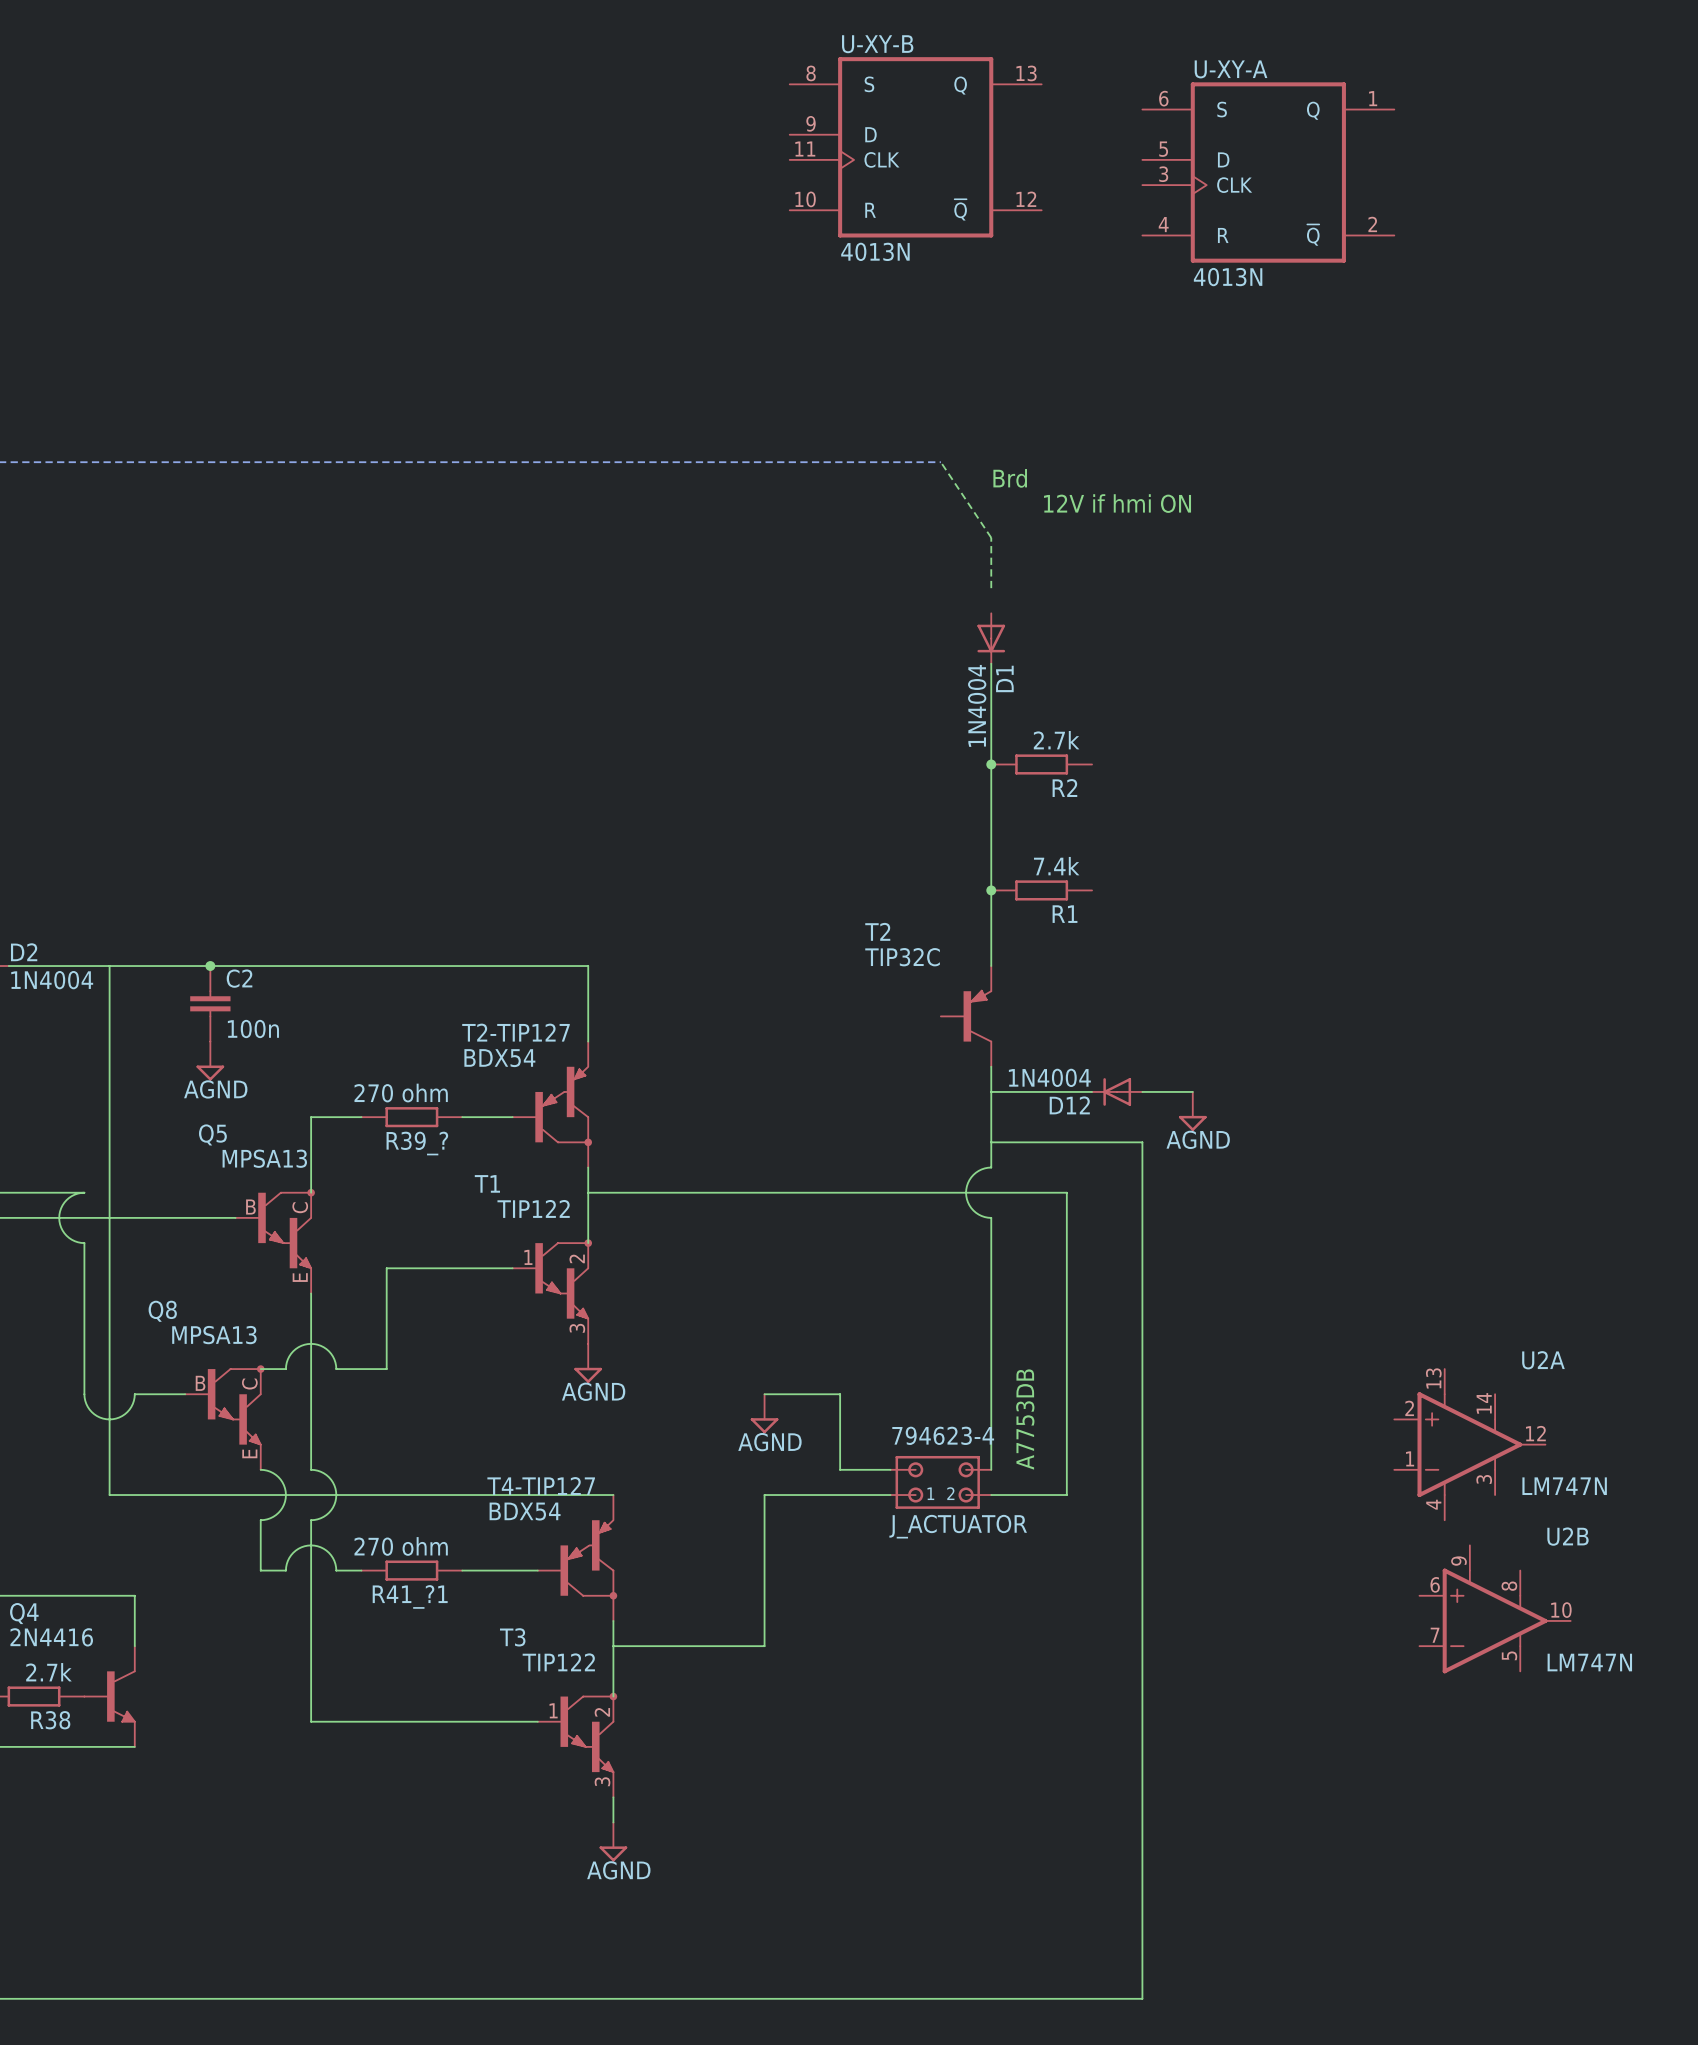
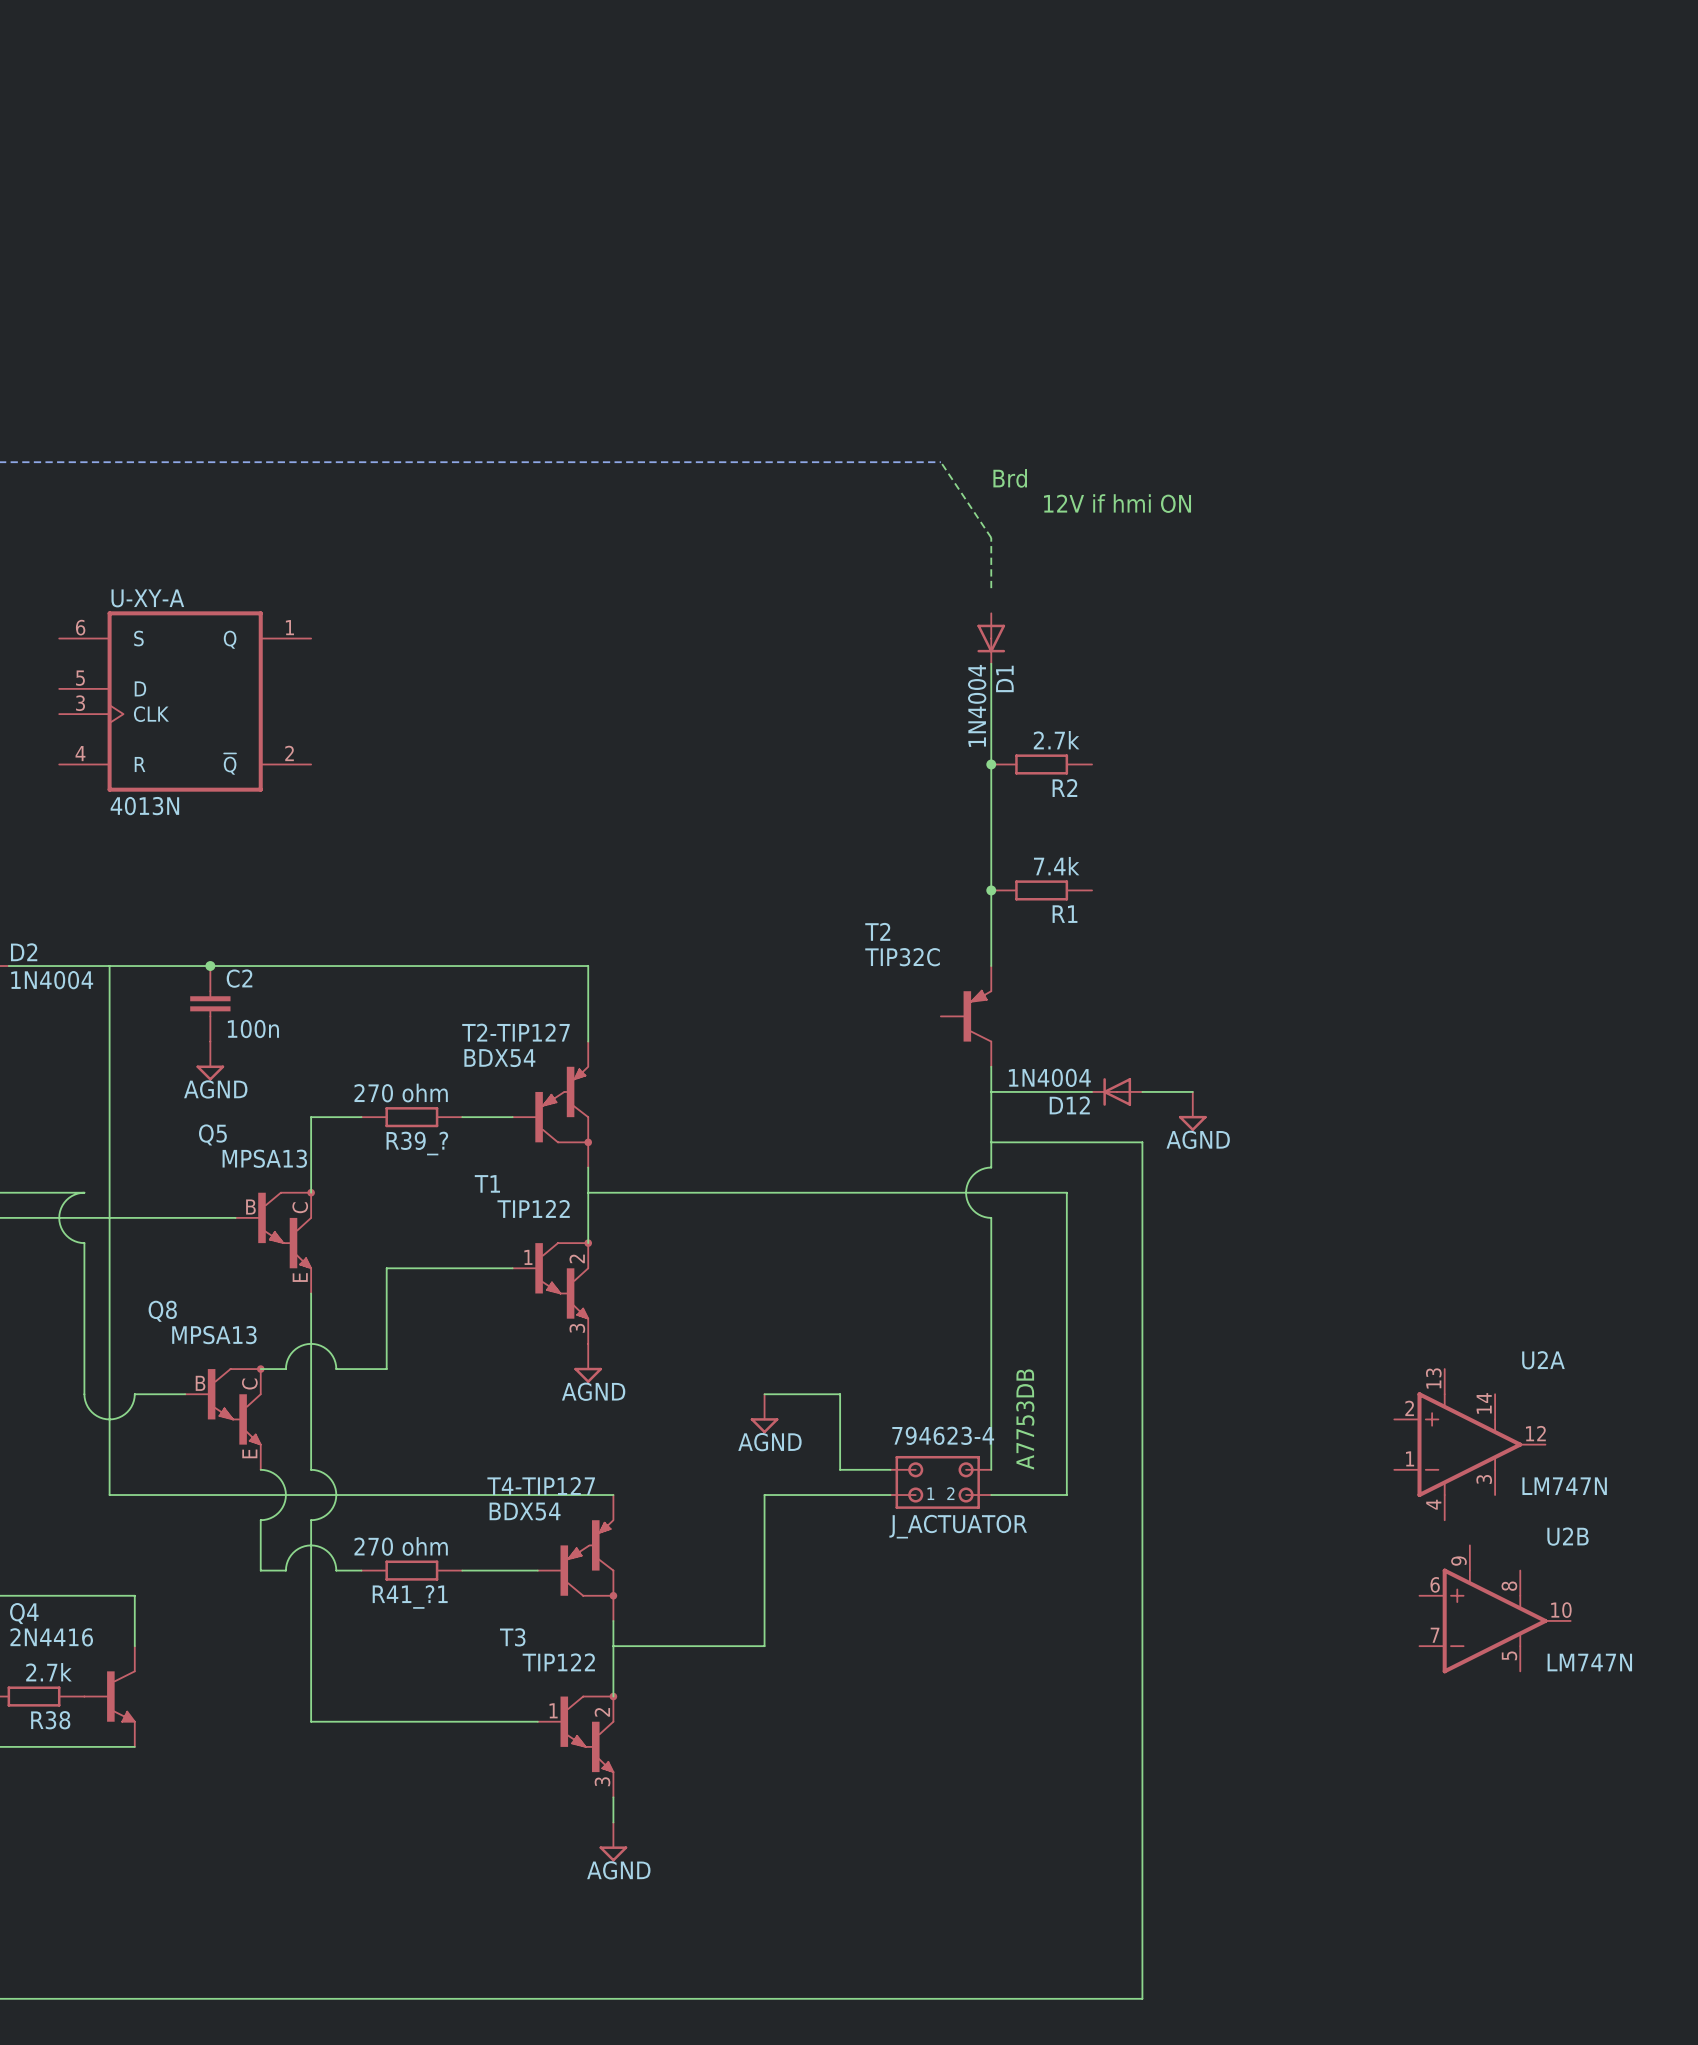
U-XY-B: 4013N (915, 147) -> none
U-XY-A: 4013N (1268, 172) -> none
U-XY-A: none -> 4013N (185, 701)

